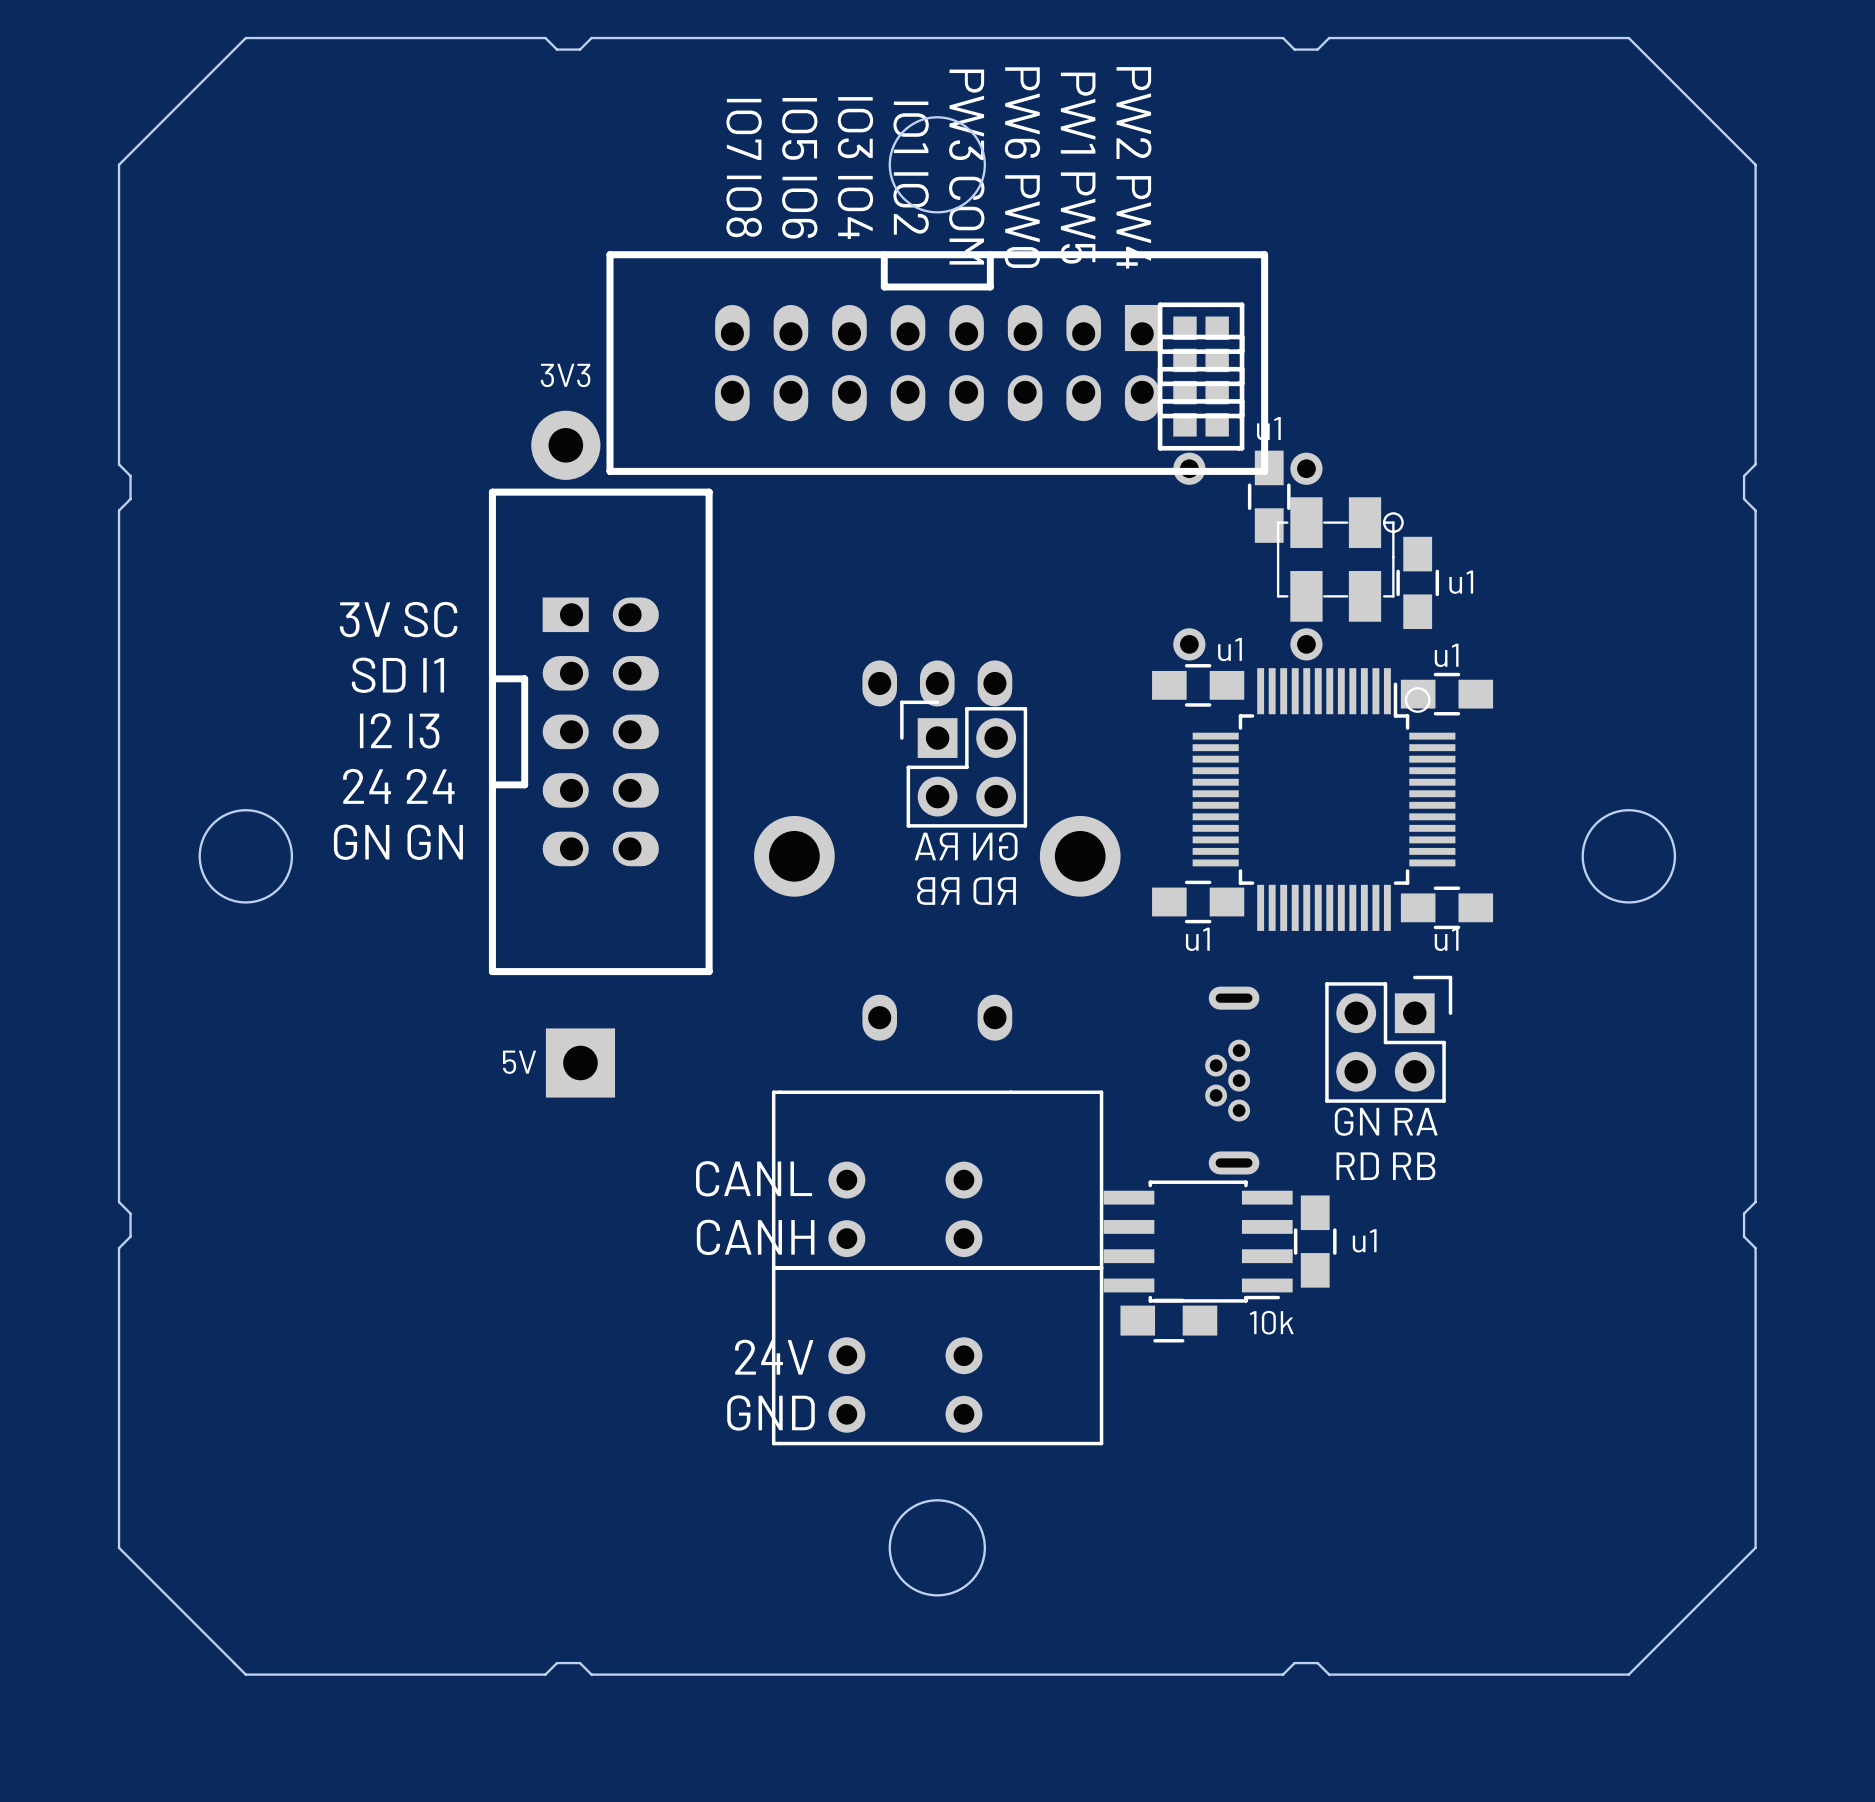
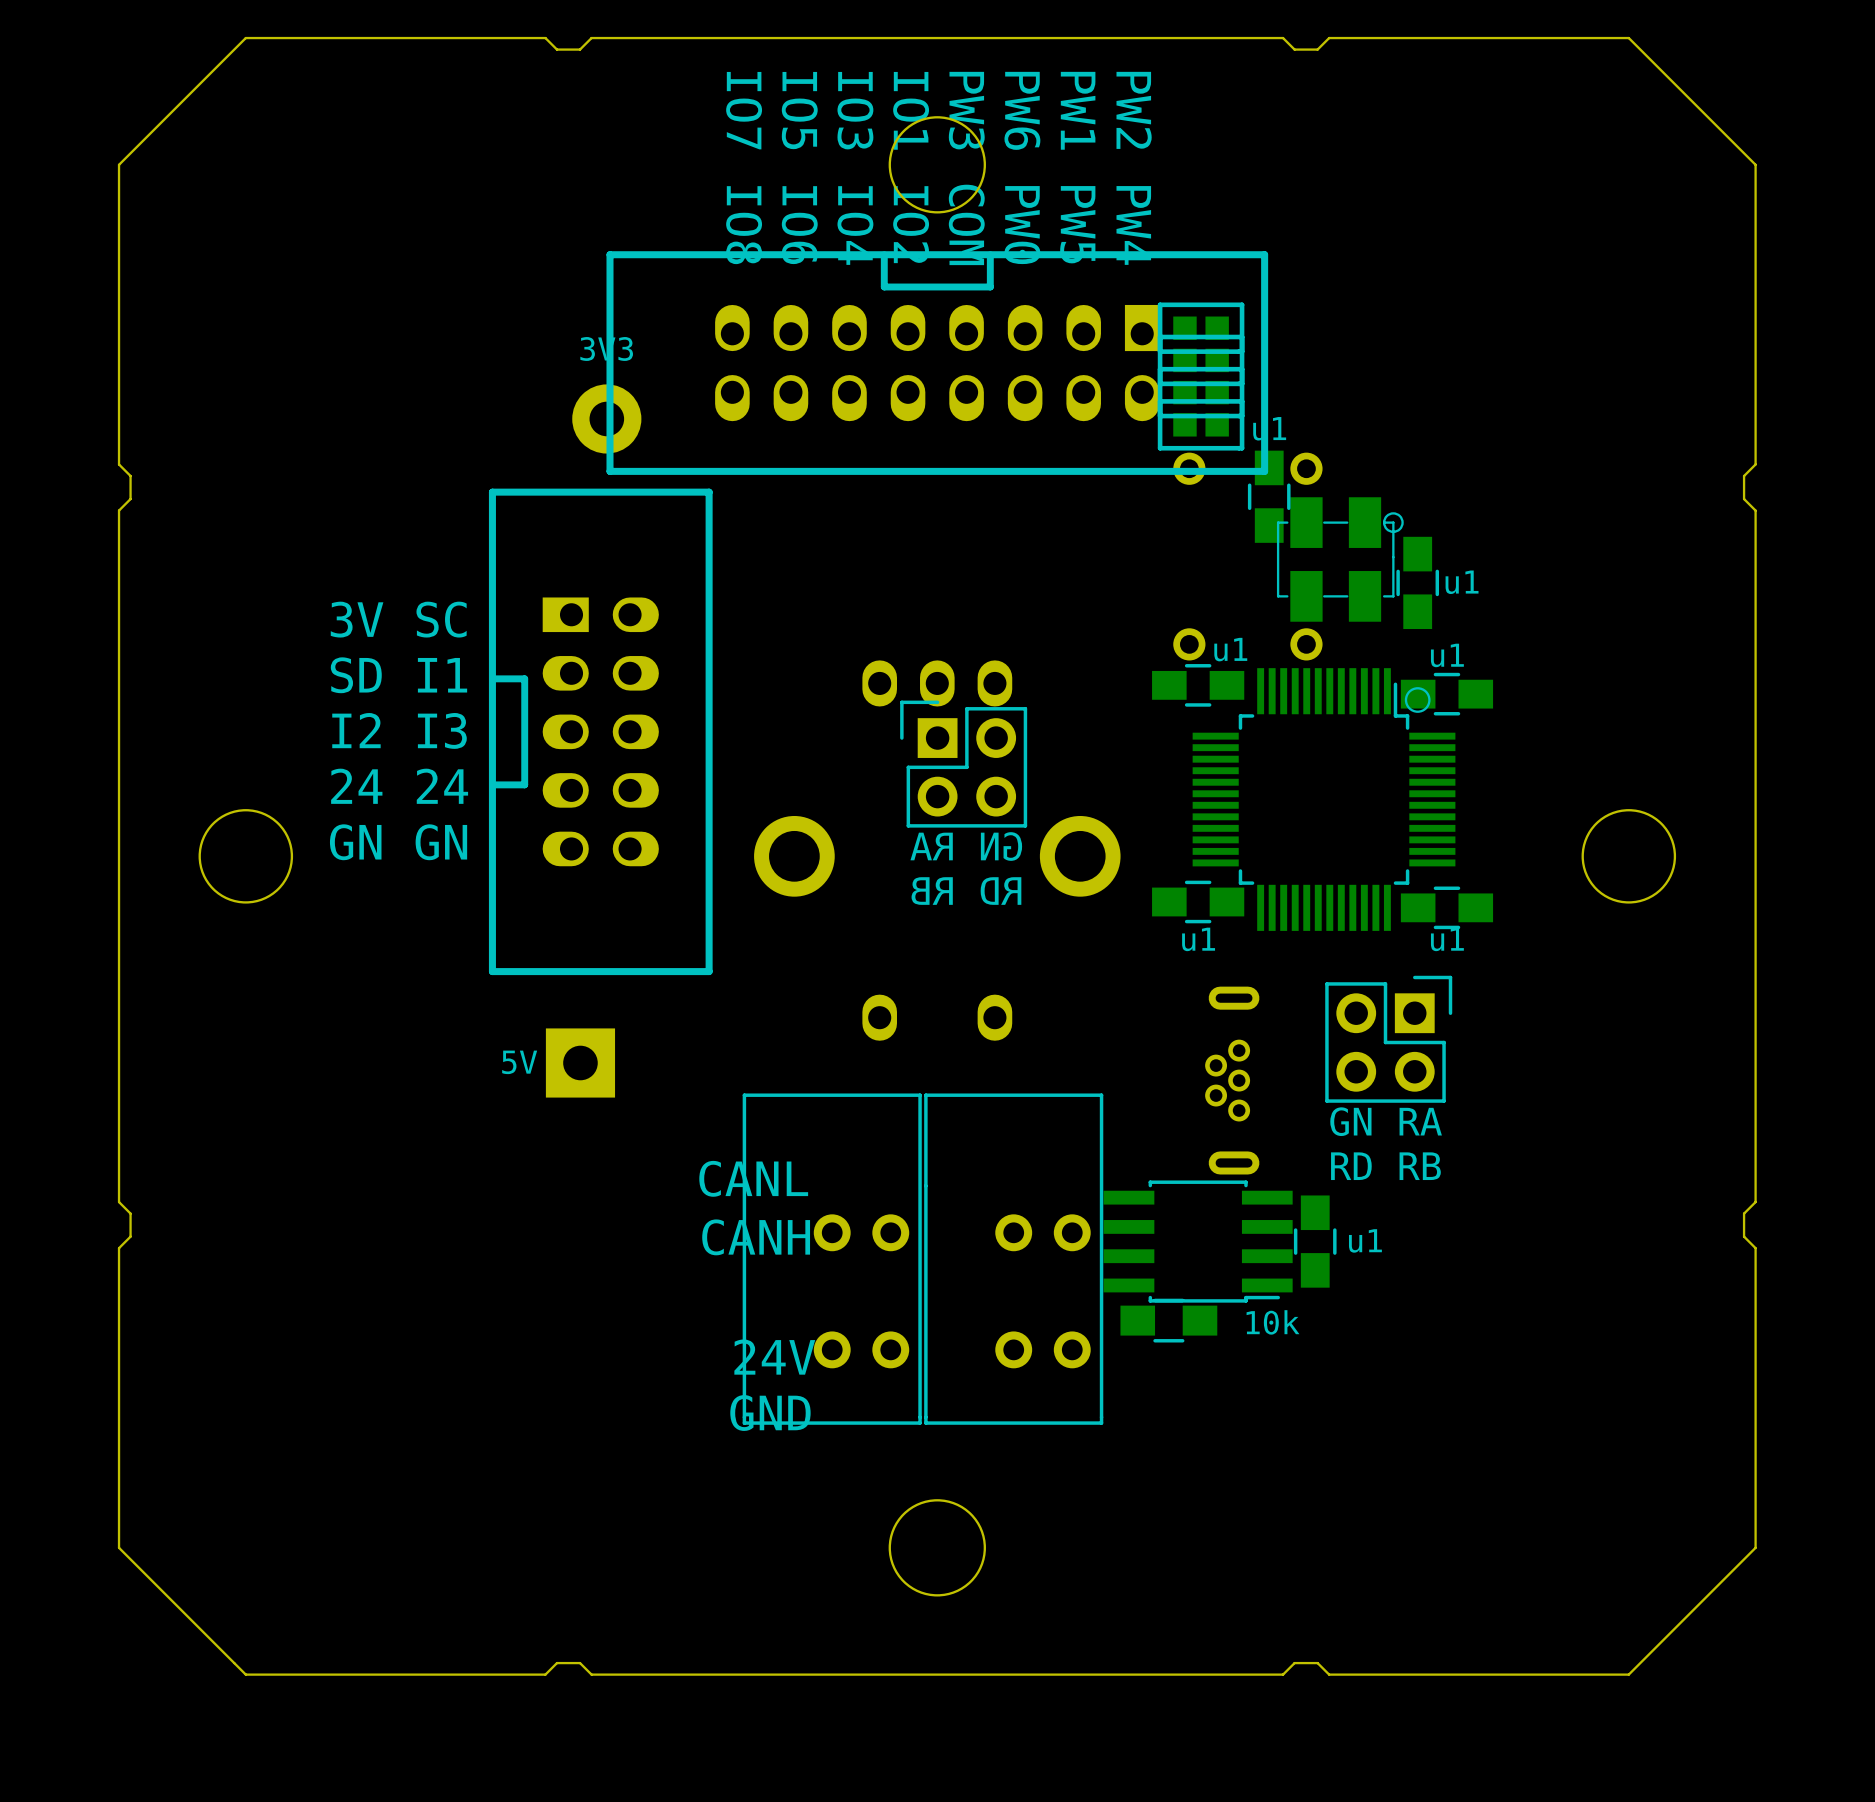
part position: (565, 445) -> (606, 418)
part: (937, 1180) -> none
part: none -> (832, 1259)
part: none -> (1013, 1259)
part: (937, 1355) -> none

